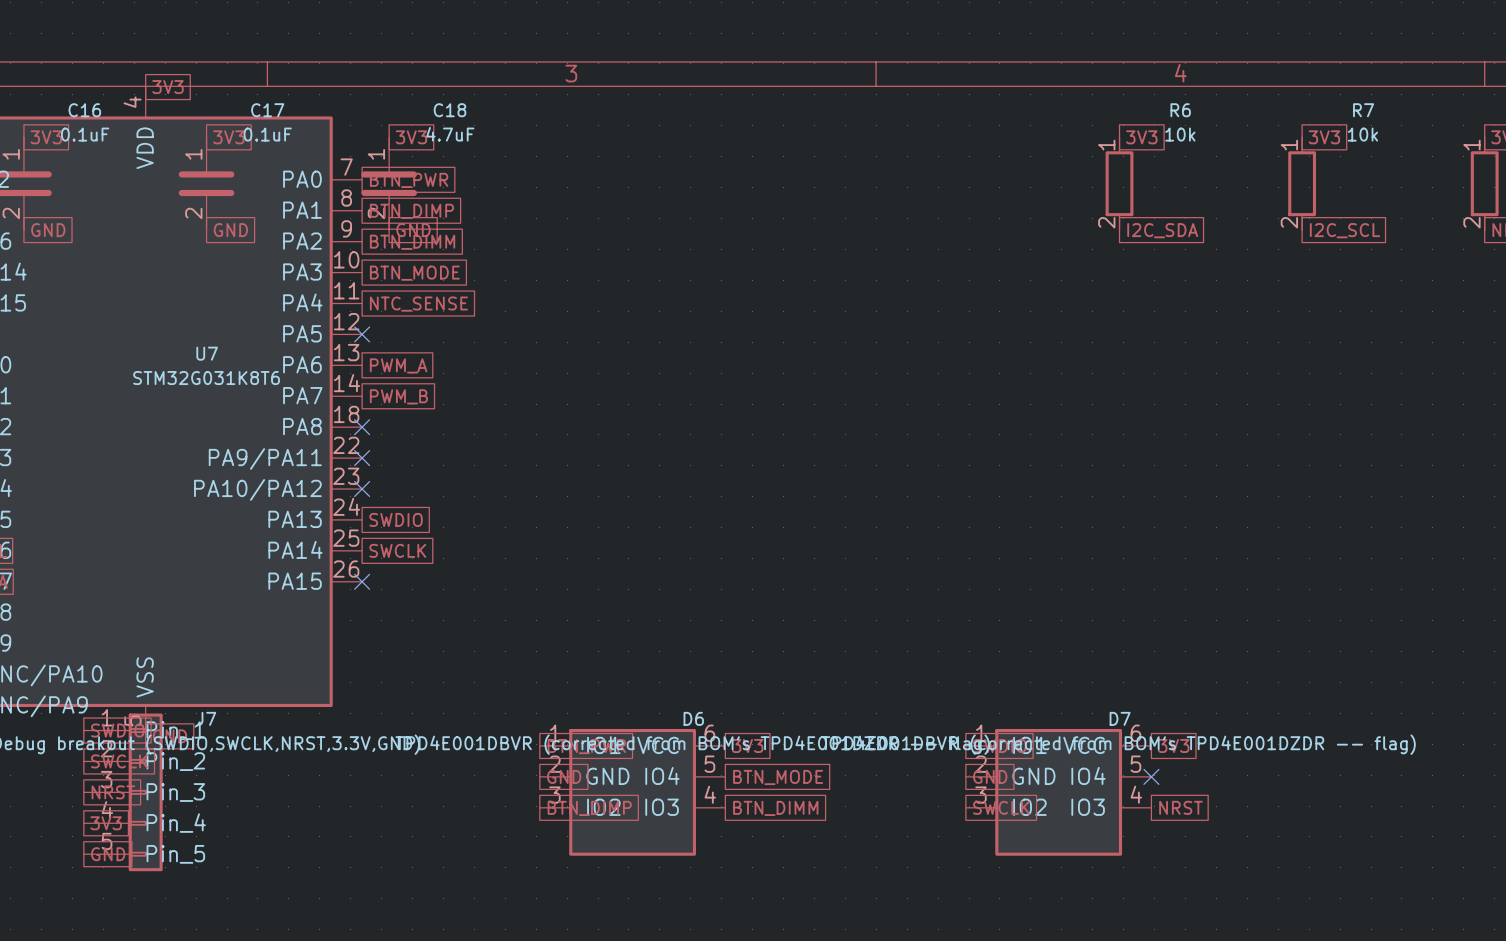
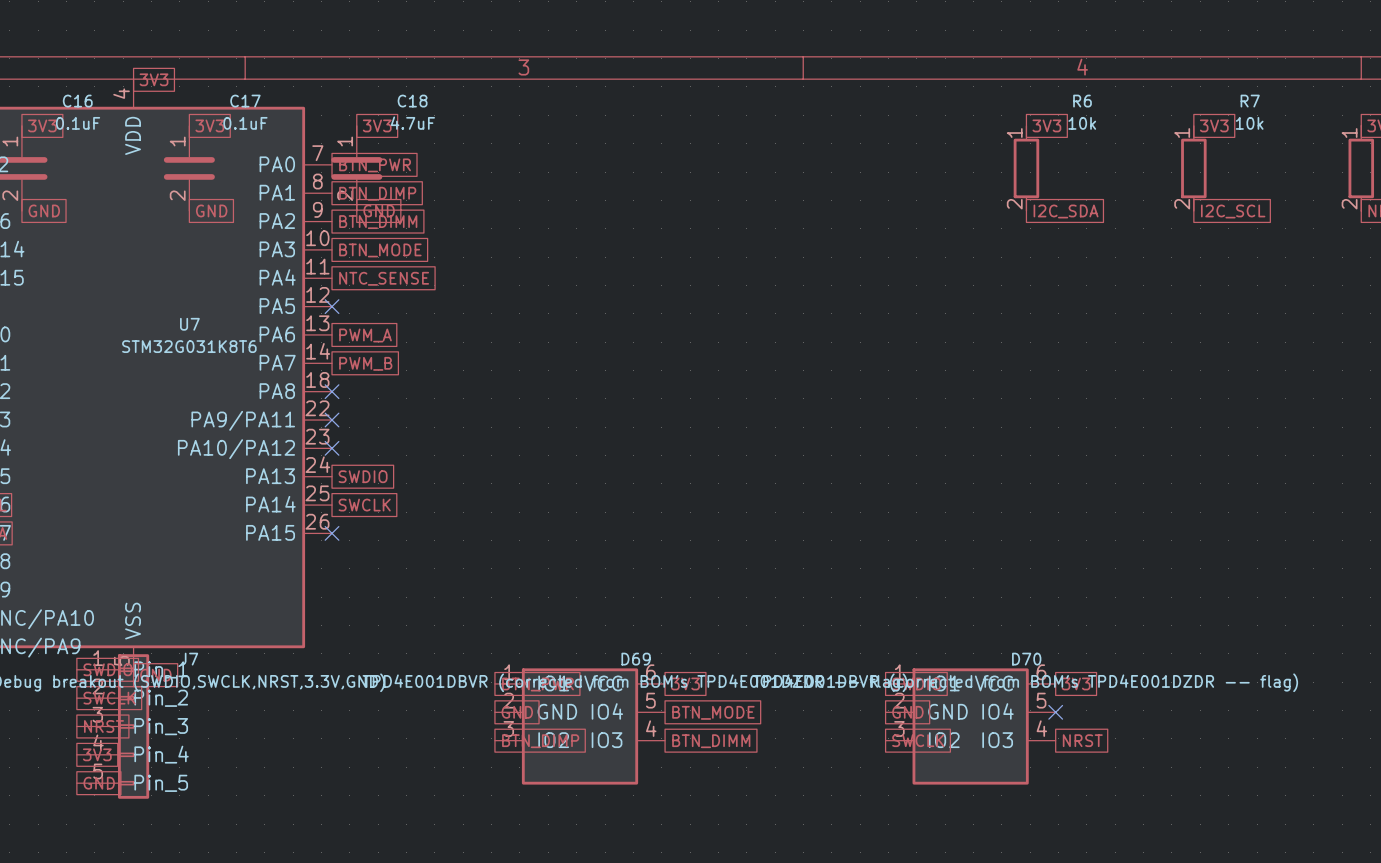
D6 name: D6 (693, 718) -> D69 (636, 659)
D7 name: D7 (1120, 718) -> D70 (1026, 659)

